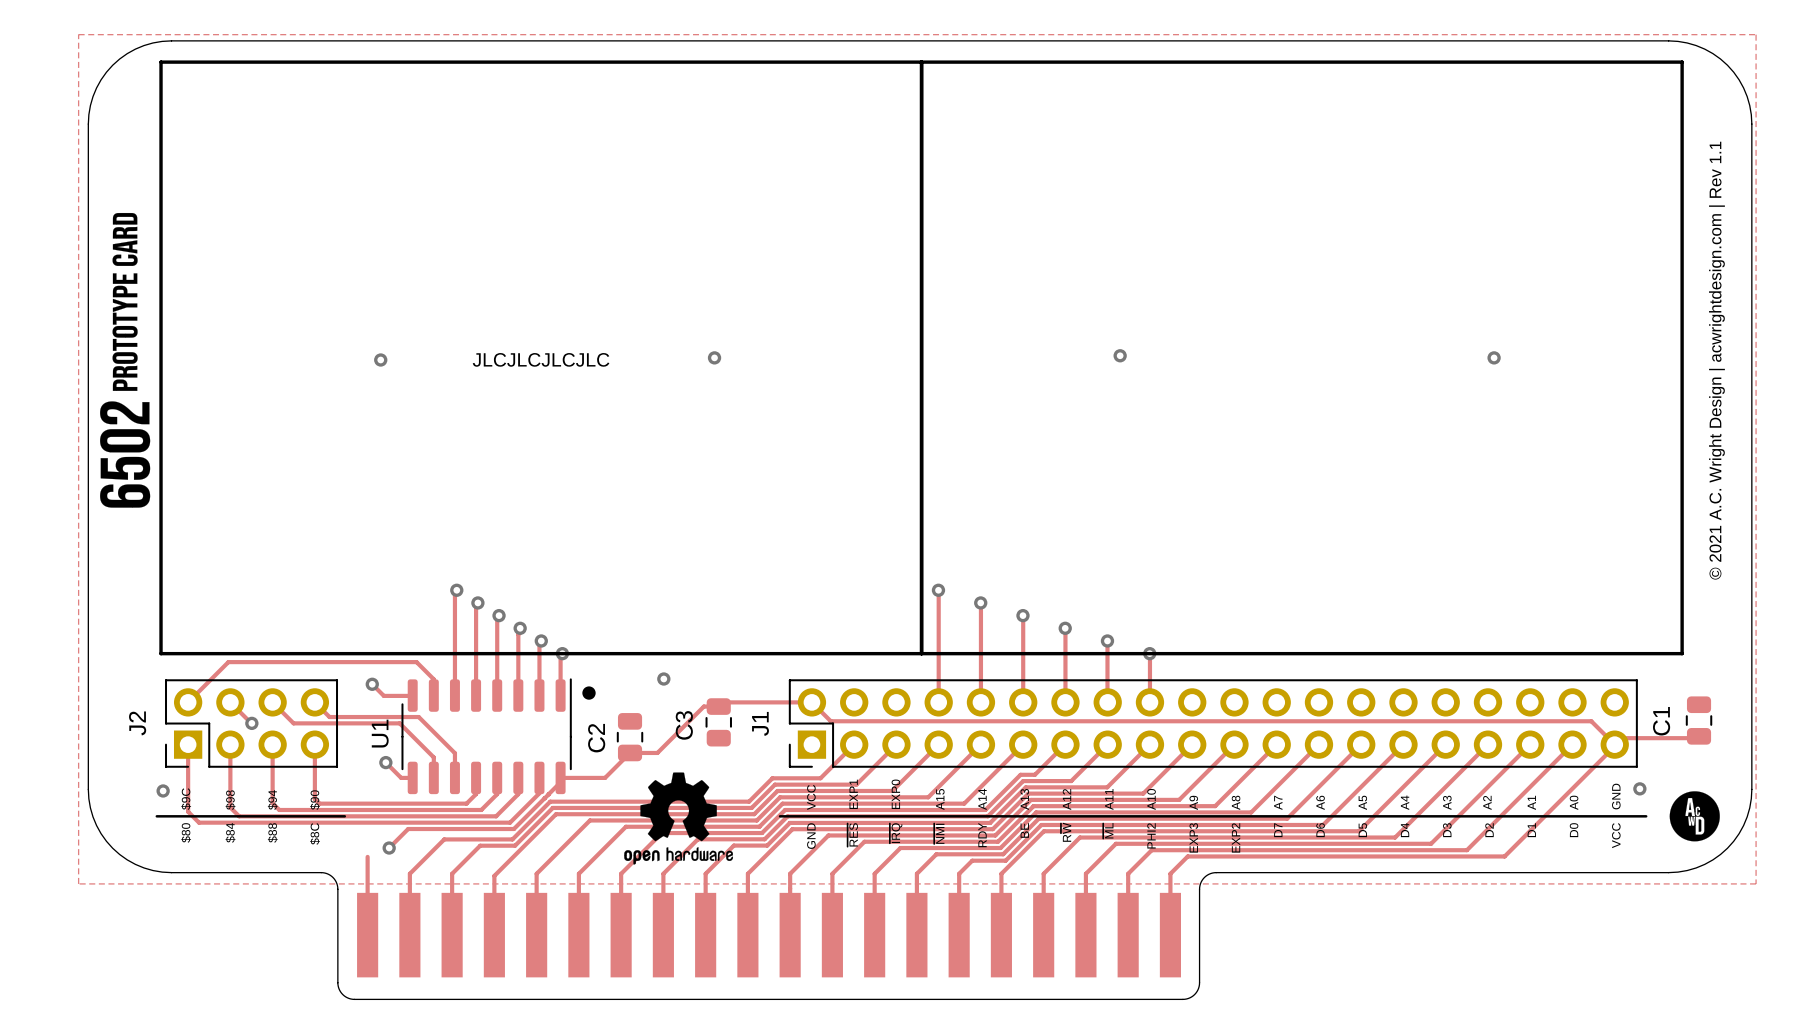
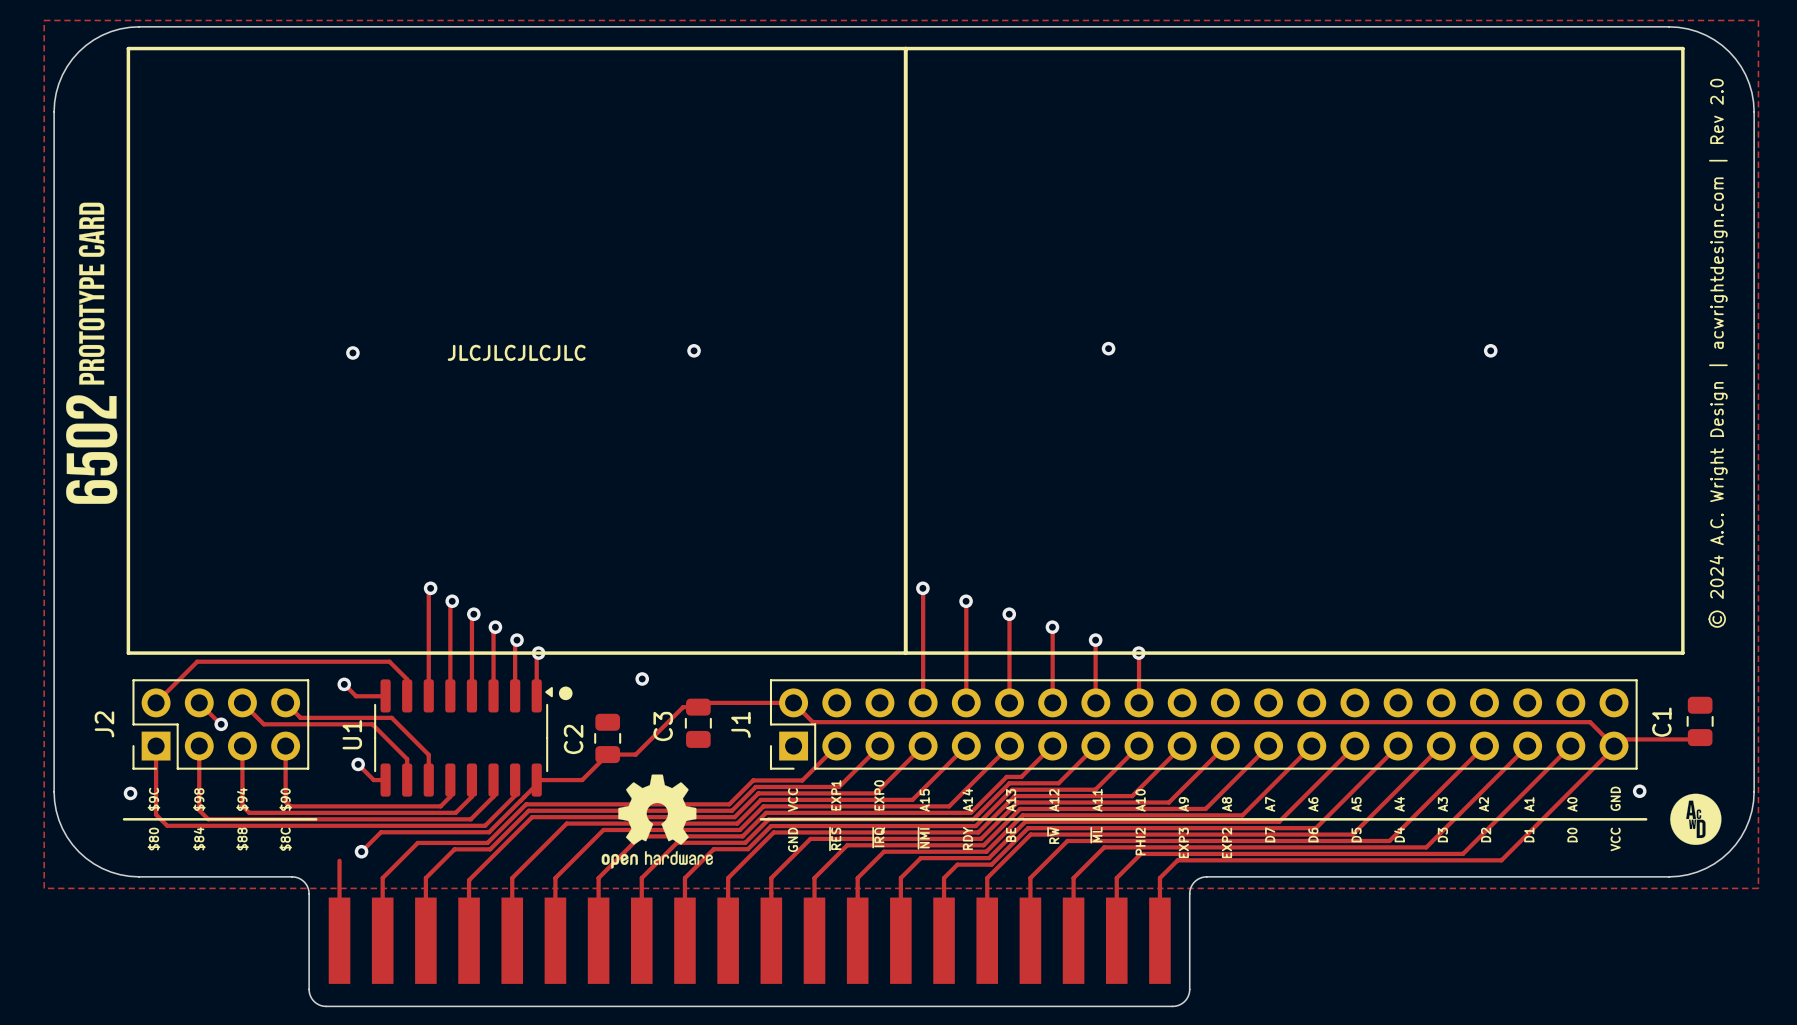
text: © 2021 A.C. Wright Design | acwrightdesign.com | Rev 1.1 (1716, 360) -> © 2024 A.C. Wright Design | acwrightdesign.com | Rev 2.0 (1718, 353)
U1 footprint: [401, 678, 572, 795] -> [374, 679, 553, 797]

